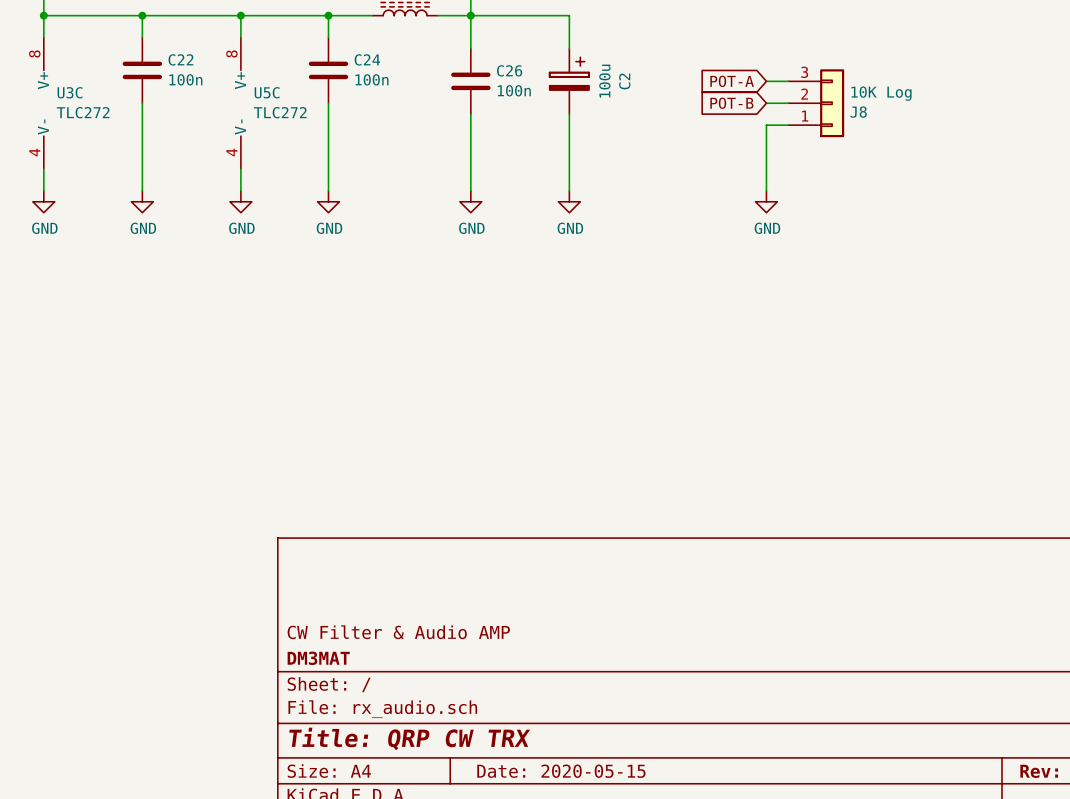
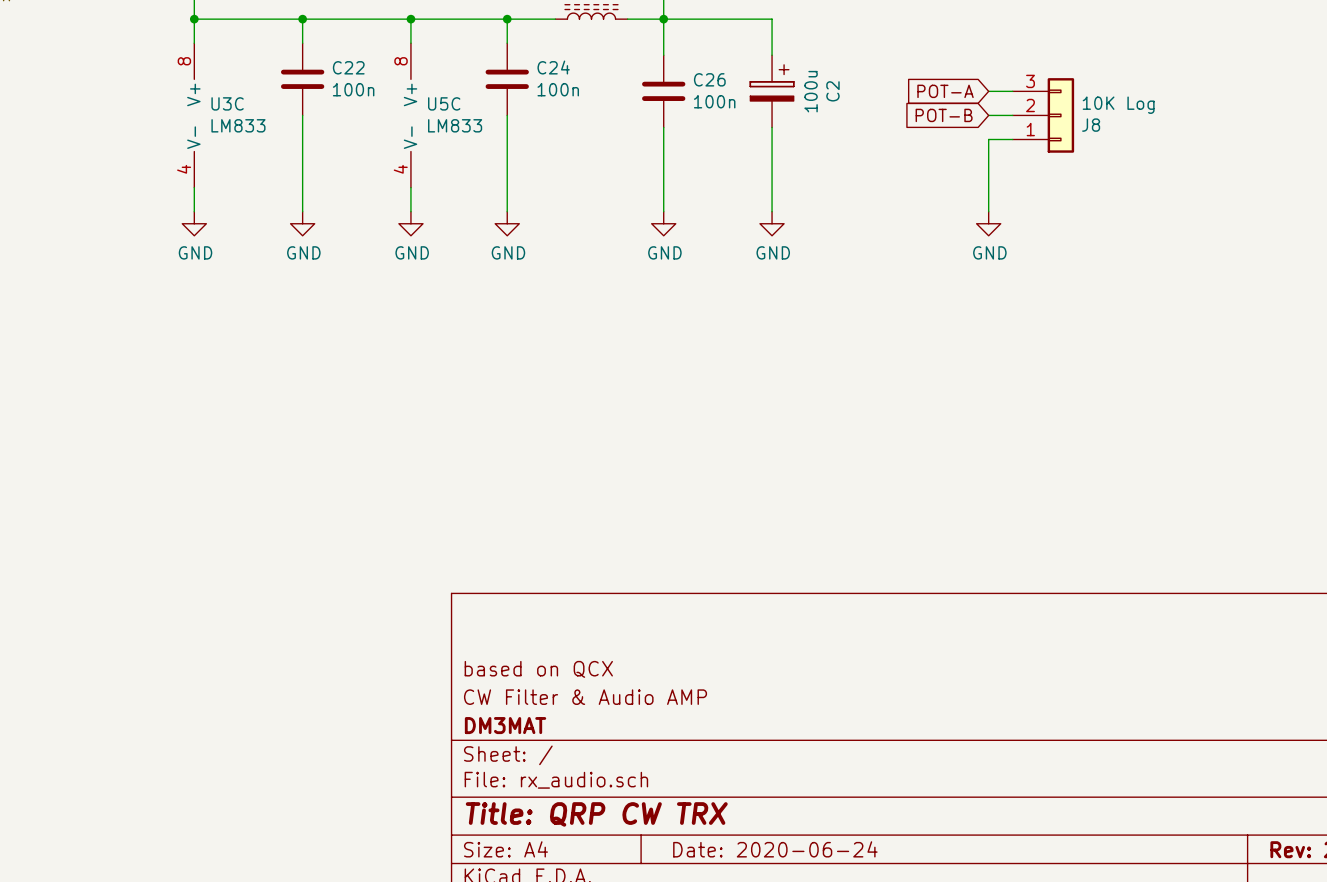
U3C value: TLC272 (83, 112) -> LM833 (238, 125)
U5C value: TLC272 (280, 112) -> LM833 (455, 125)
title block: none -> based on QCX (538, 669)
title block: Date: 2020-05-15 (561, 771) -> Date: 2020-06-24 (775, 849)

